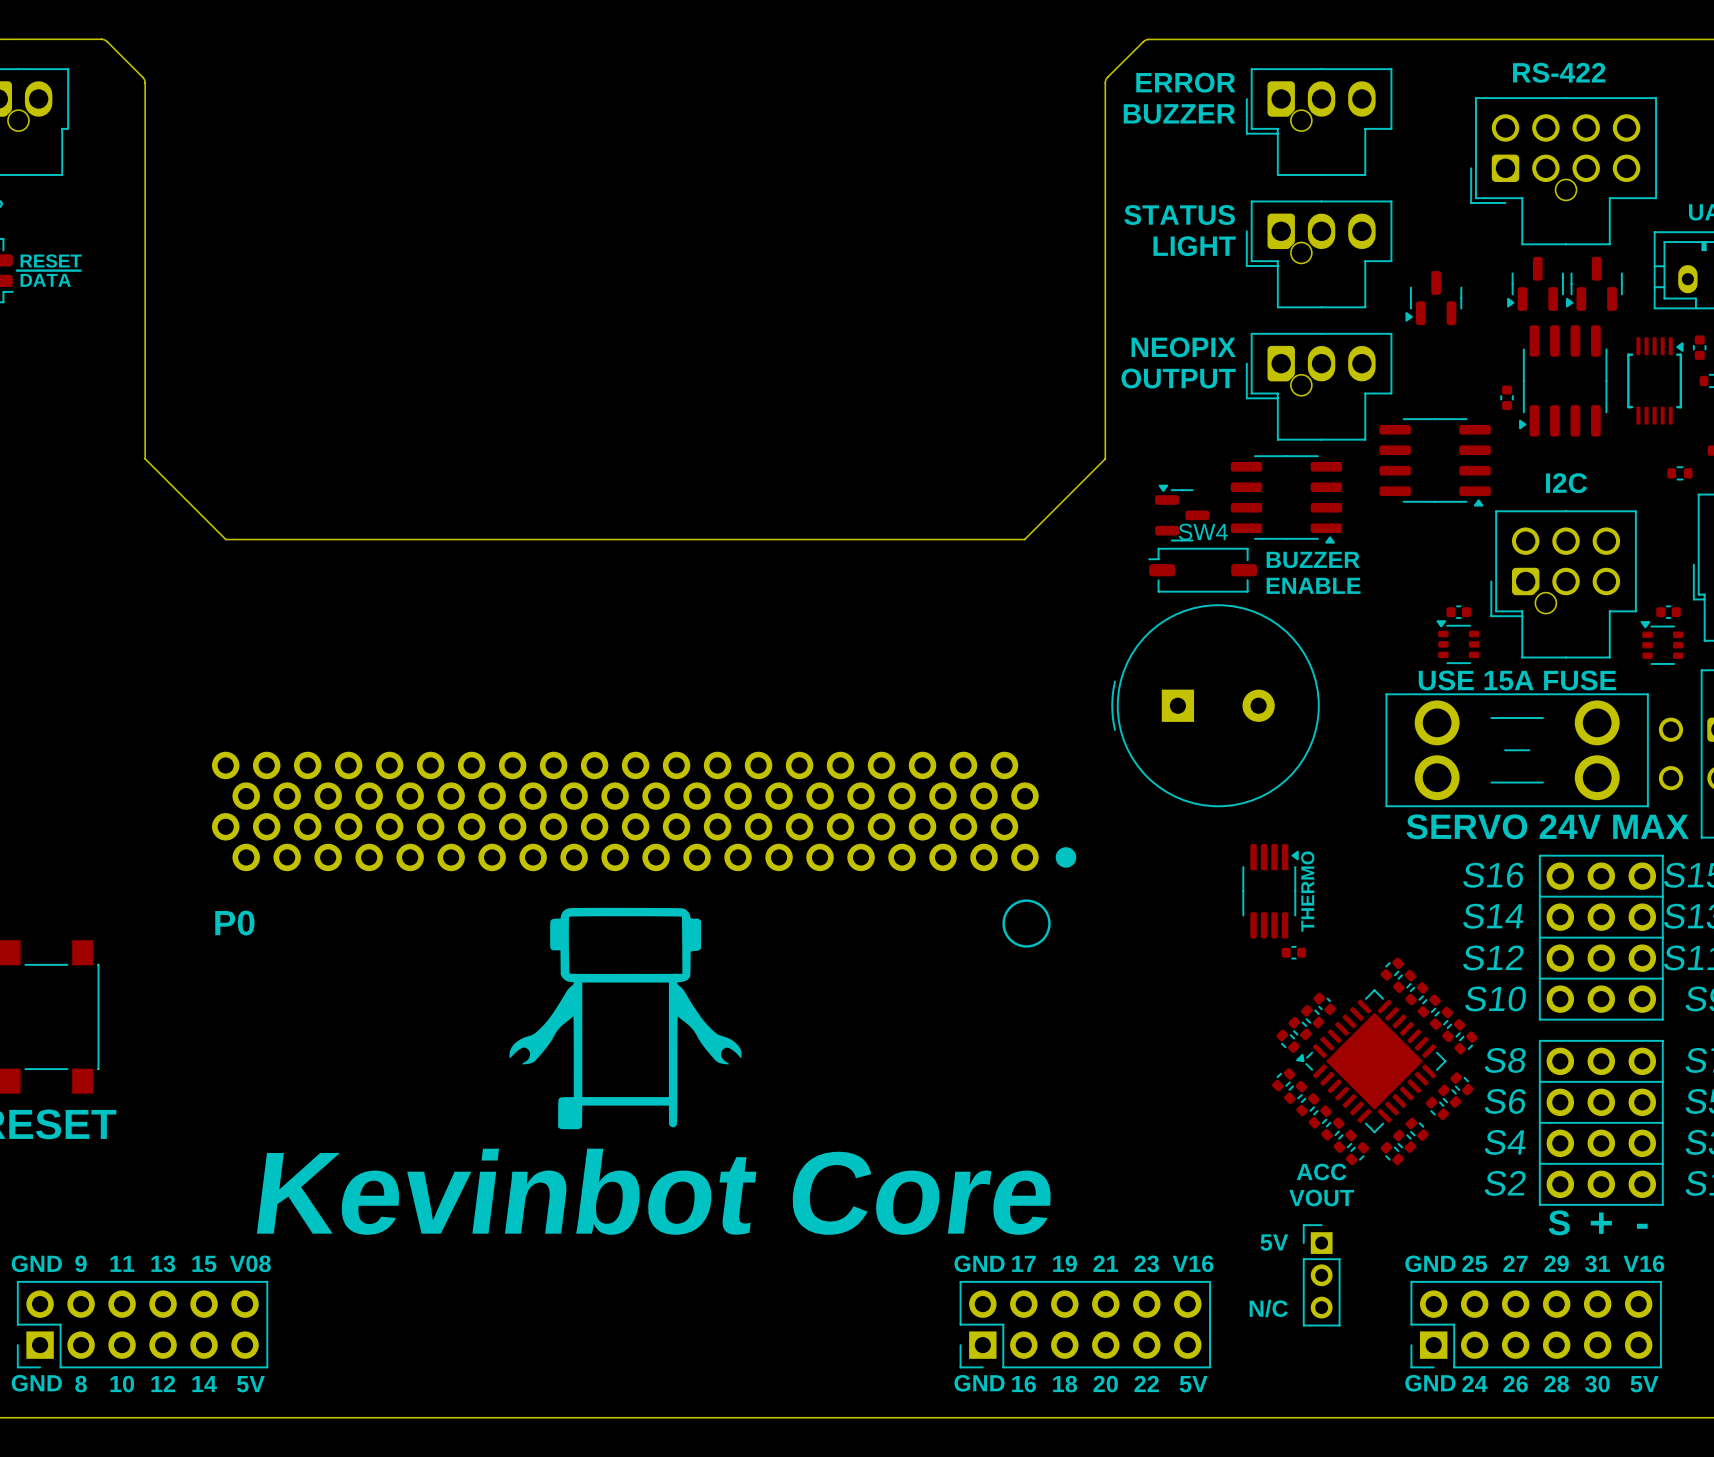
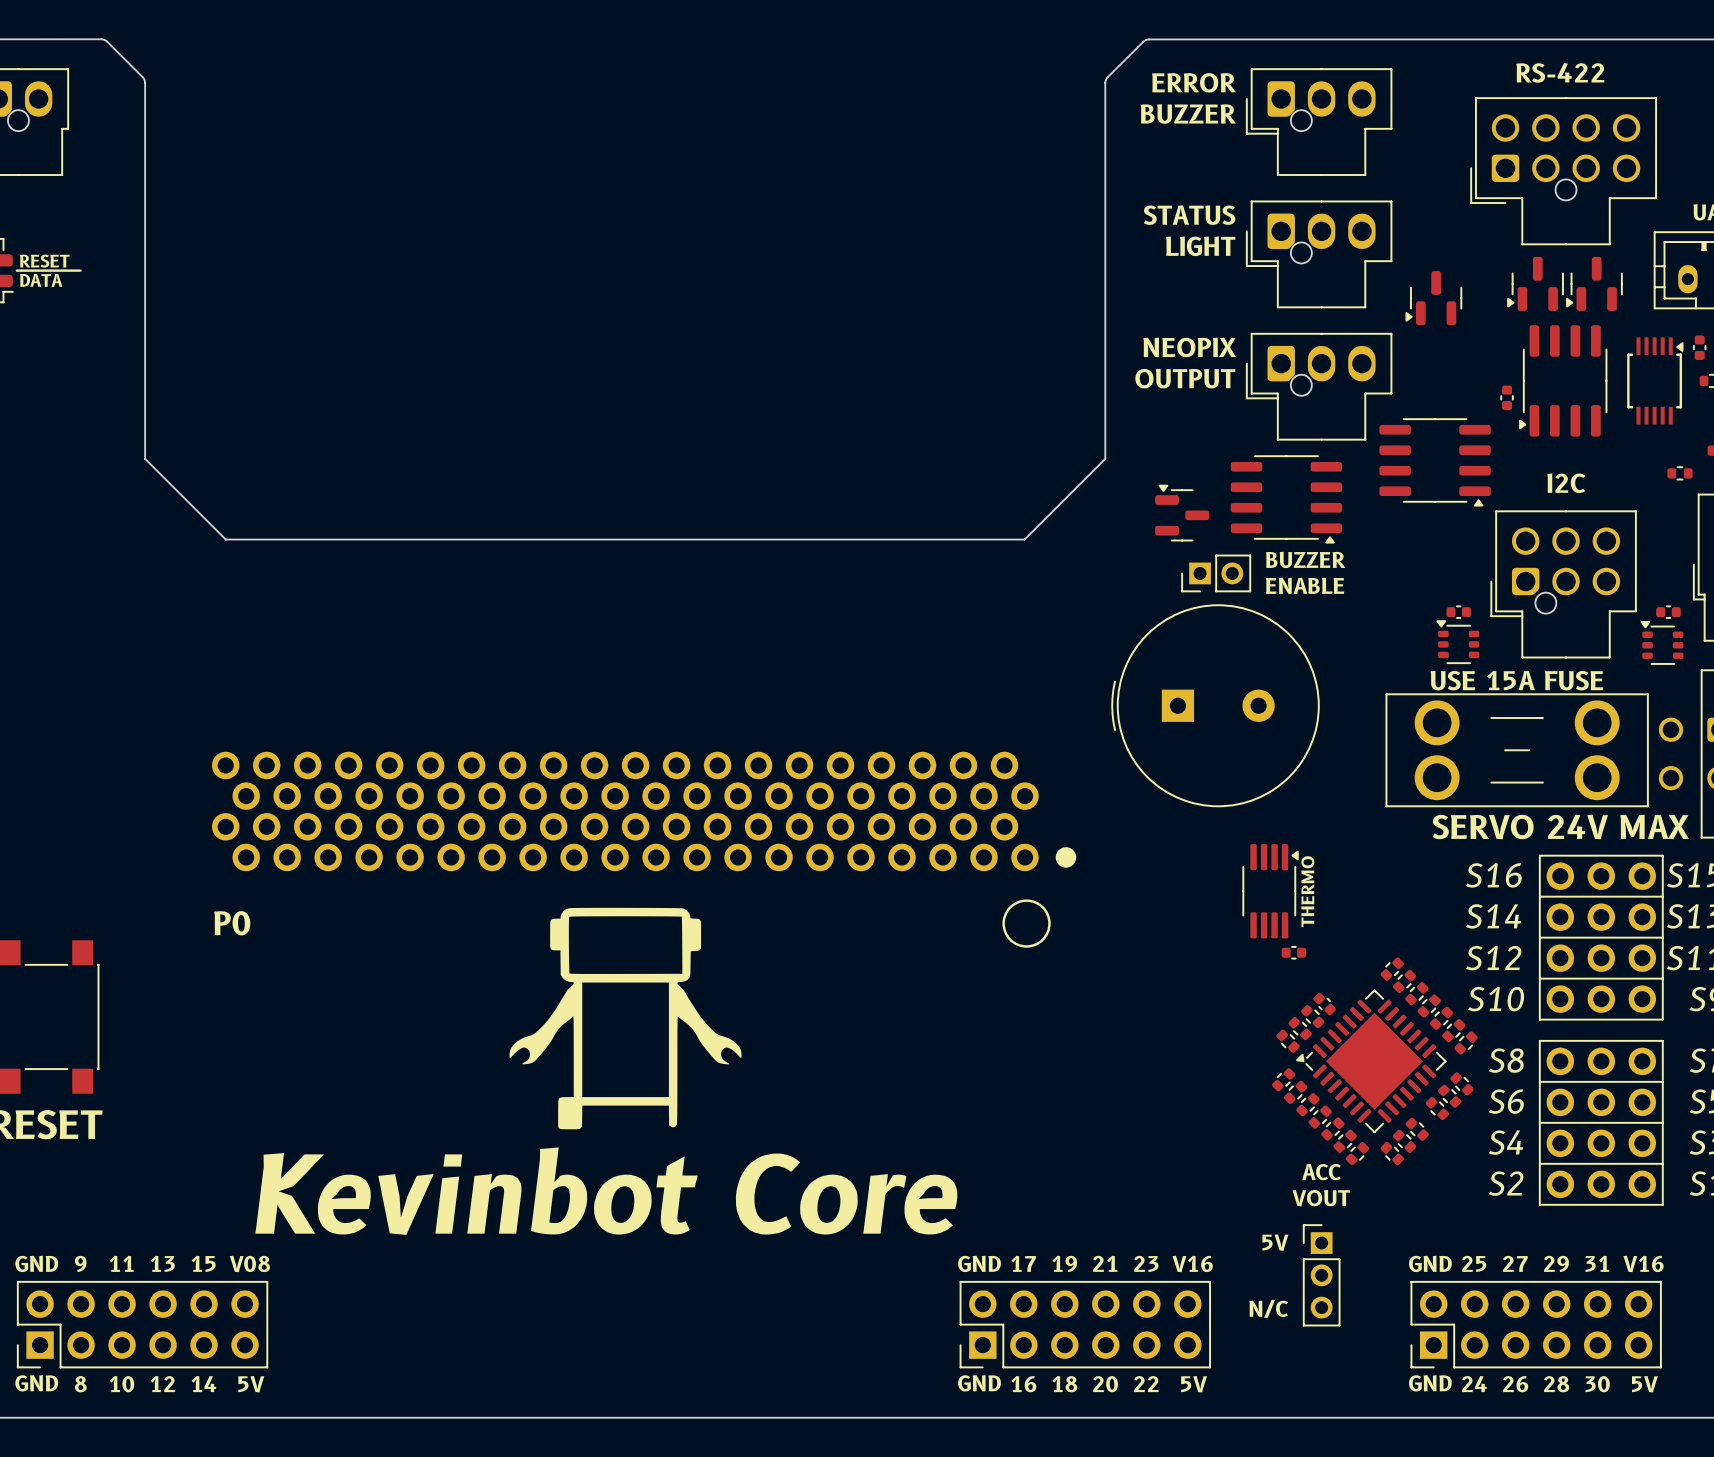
SW4: (1202, 570) -> none
part: none -> (1216, 573)
text: S (1559, 1222) -> none
text: + (1601, 1223) -> none
text: - (1642, 1226) -> none

